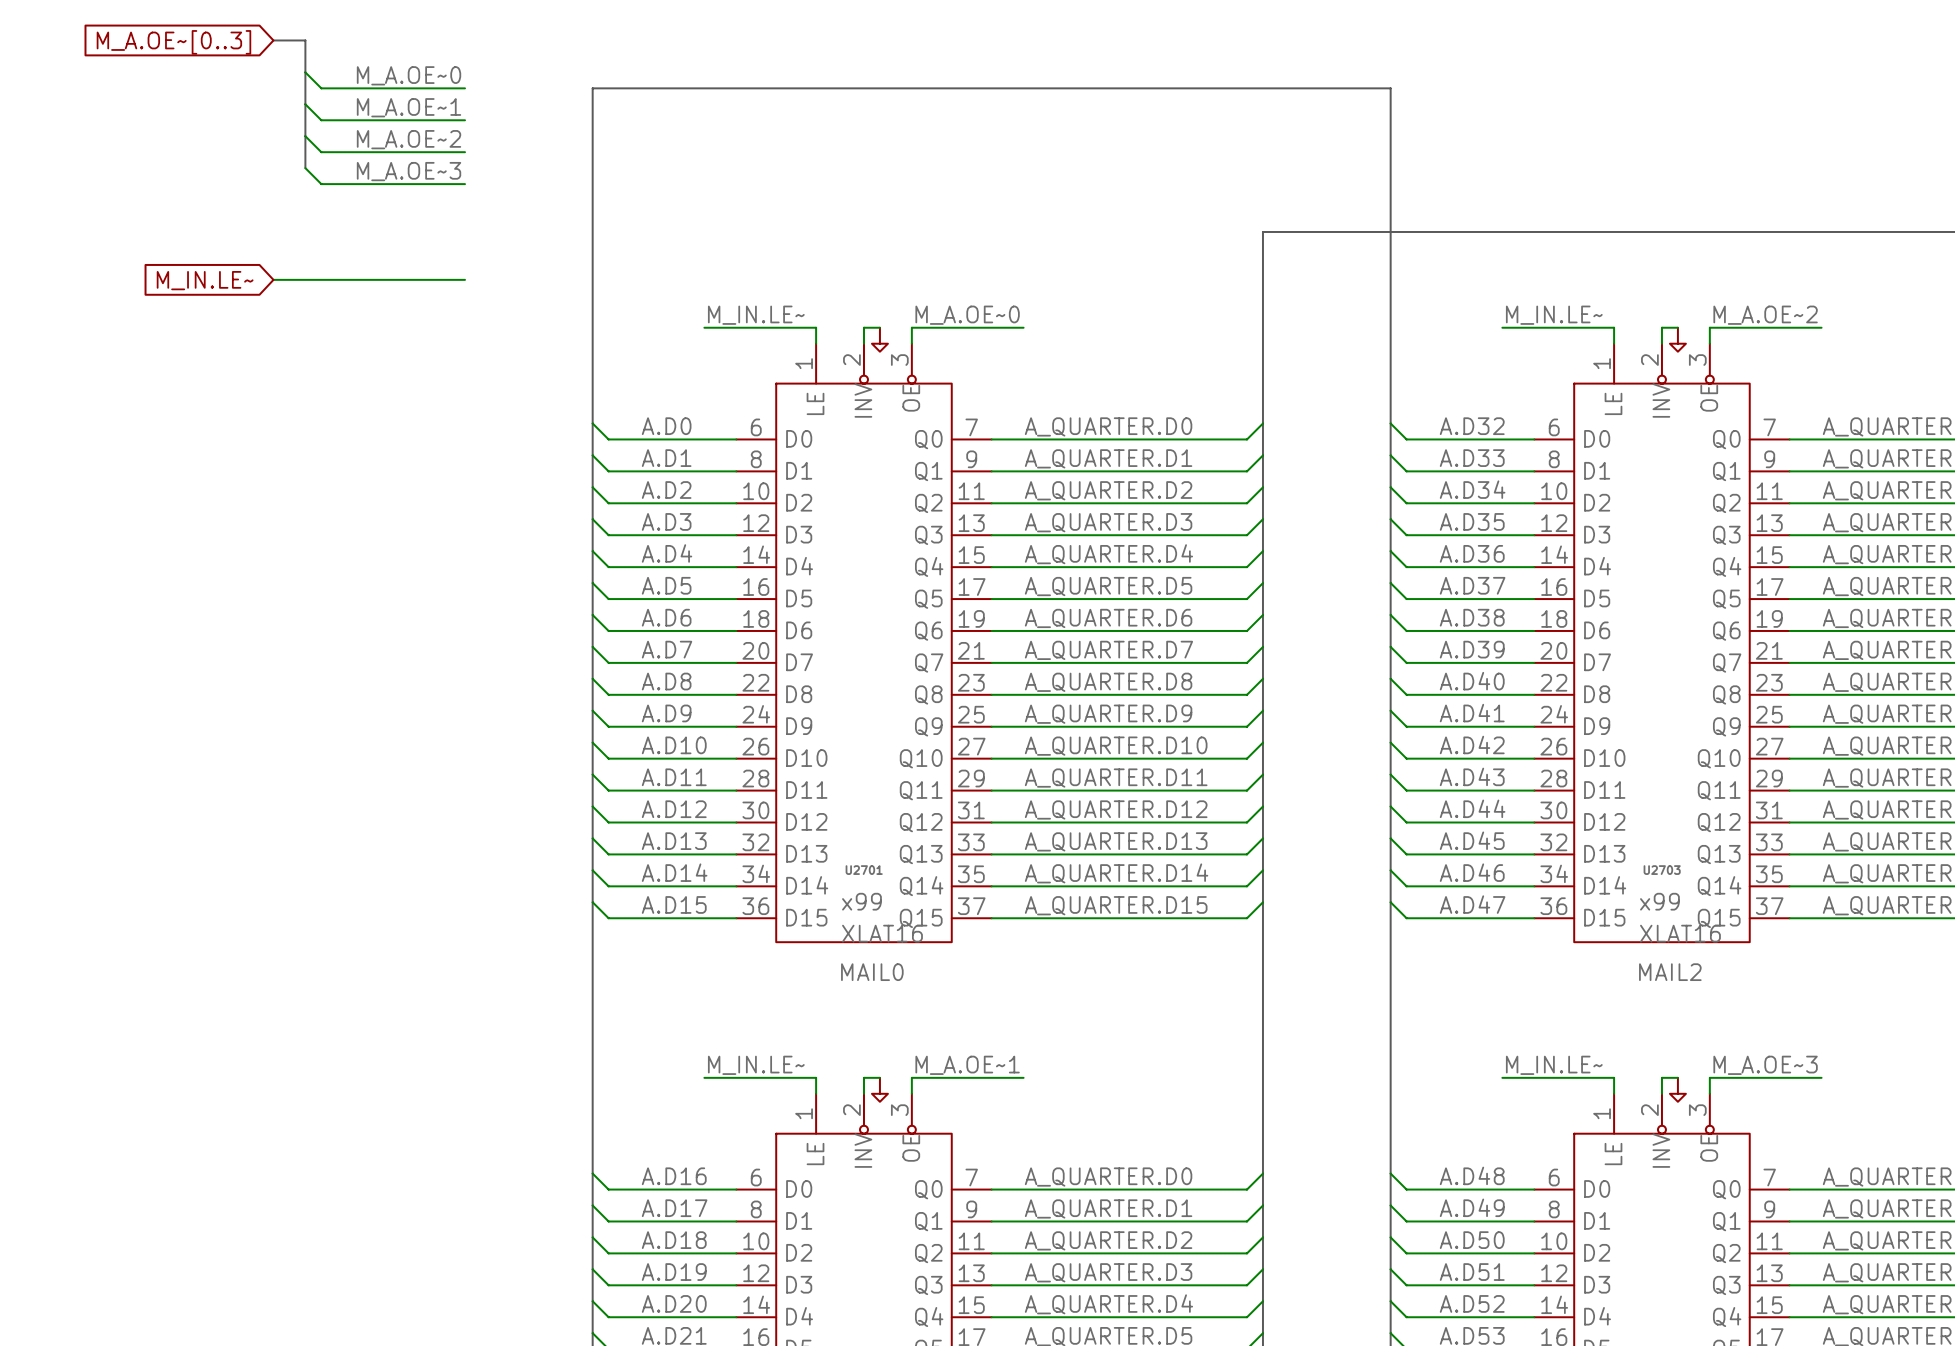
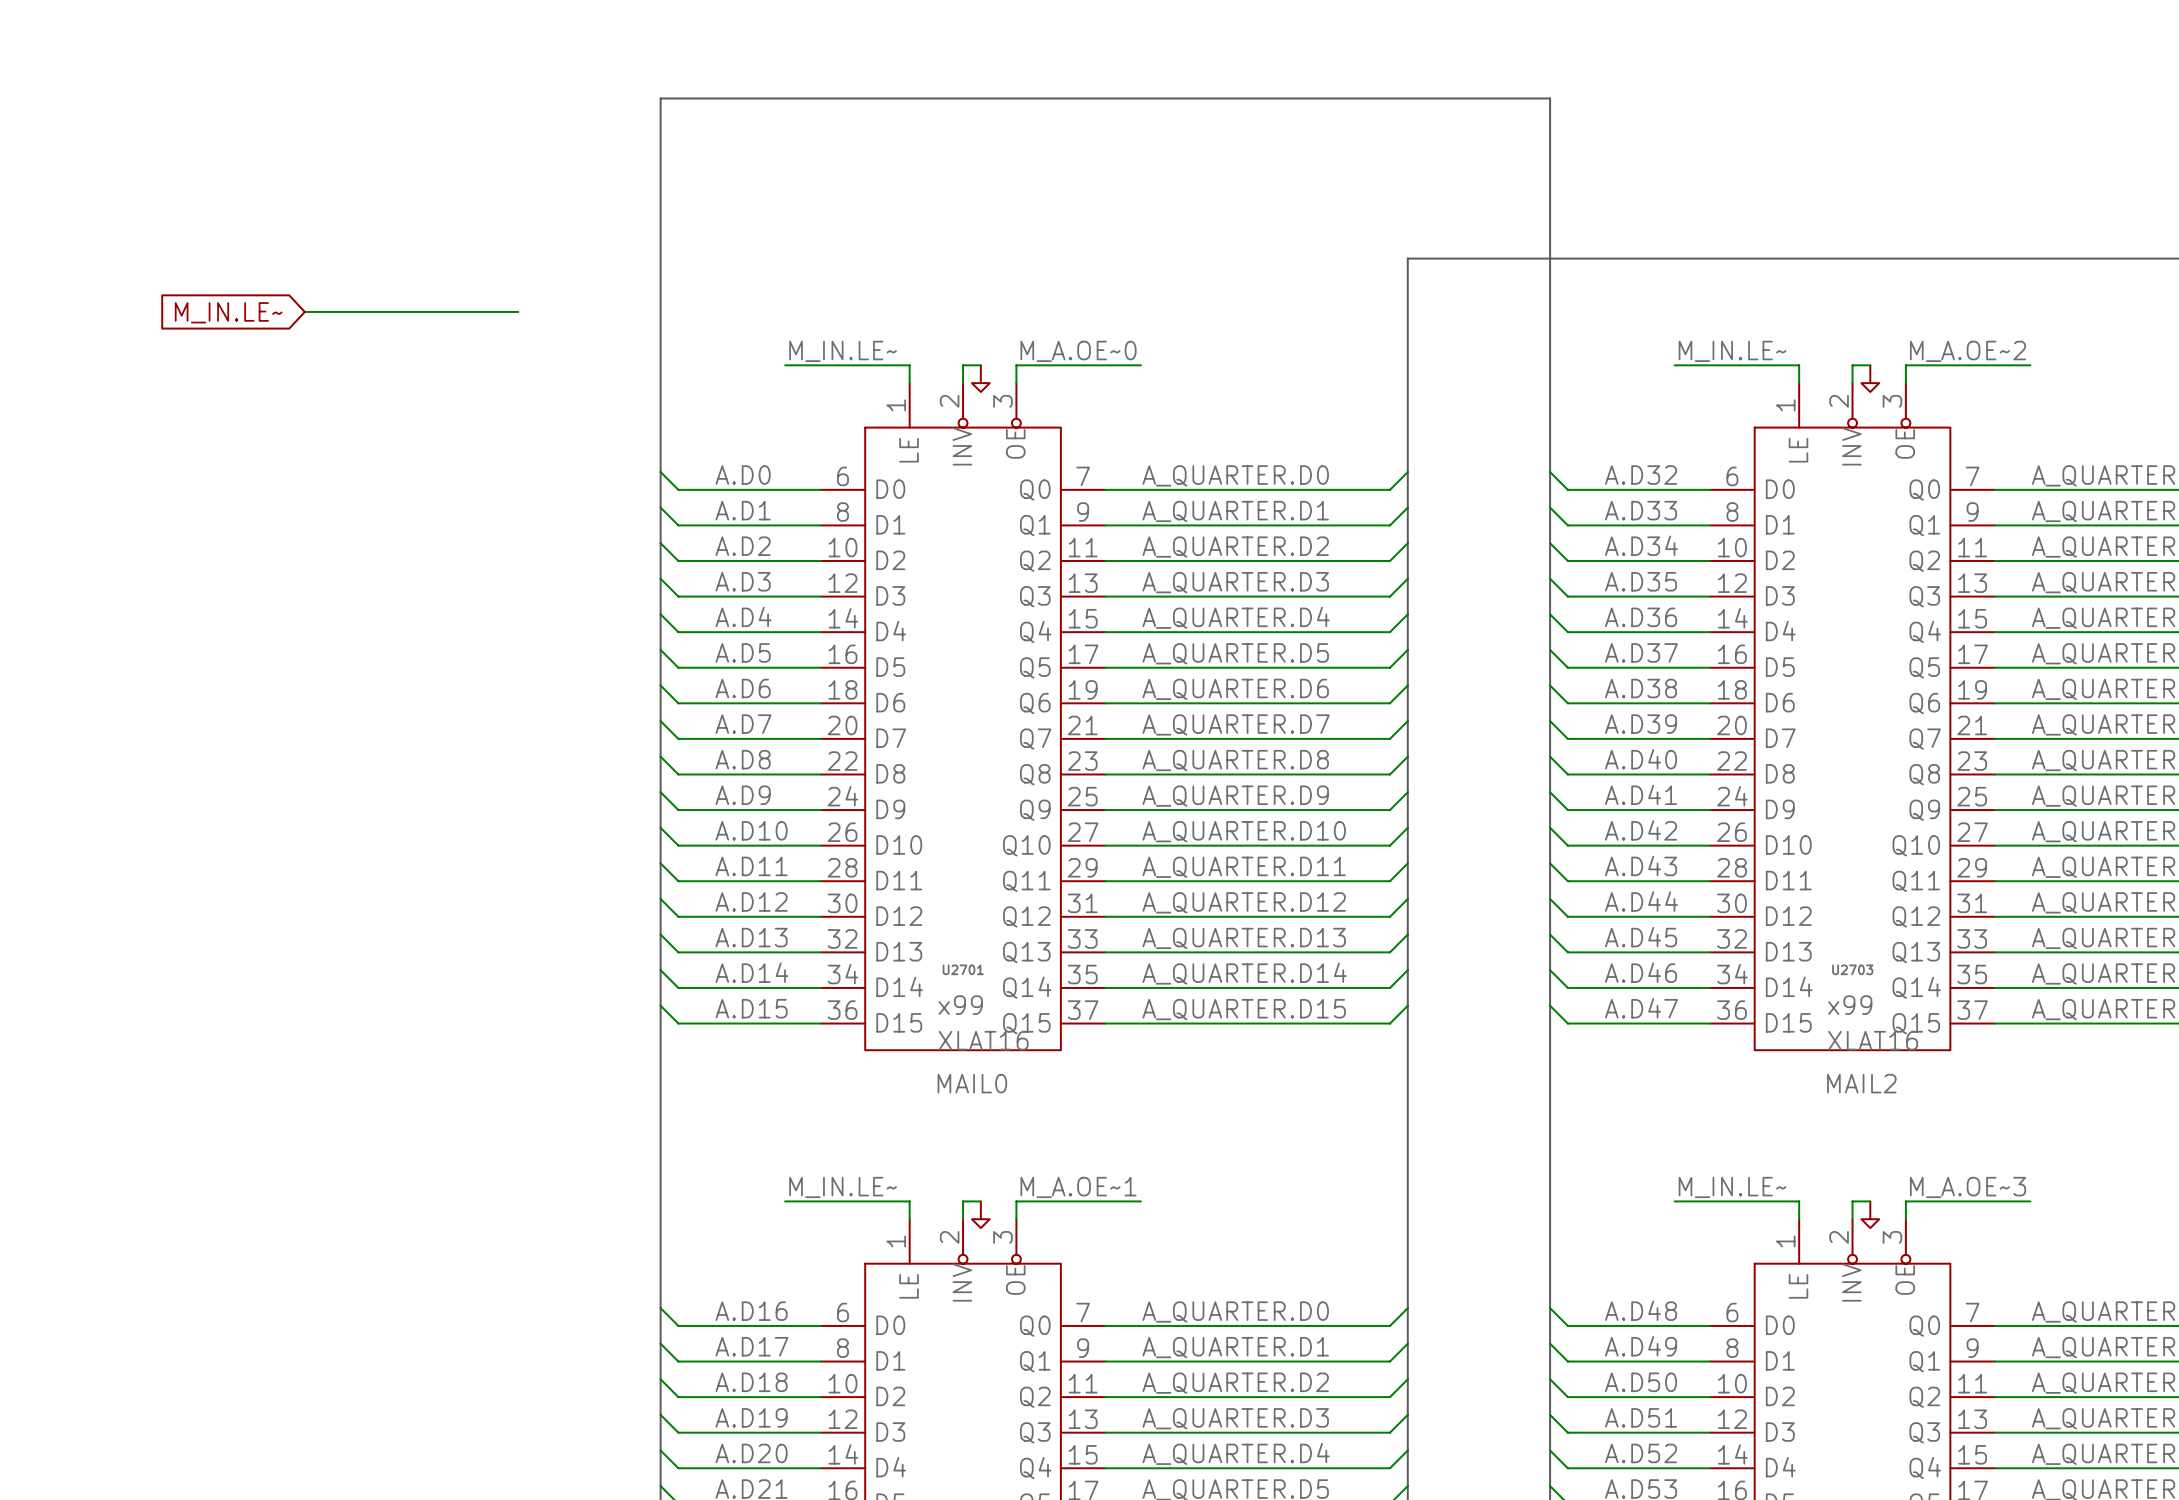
bus: (273, 40) (305, 40) (305, 168) -> none
global label: M_A.OE~[0..3] (173, 42) -> none
wire: (305, 72) (321, 88) (465, 88) -> none
label: M_A.OE~0 (409, 75) -> none
wire: (305, 104) (321, 120) (465, 120) -> none
label: M_A.OE~1 (409, 107) -> none
wire: (305, 136) (321, 152) (465, 152) -> none
label: M_A.OE~2 (409, 139) -> none
wire: (305, 168) (321, 184) (465, 184) -> none
label: M_A.OE~3 (409, 171) -> none

